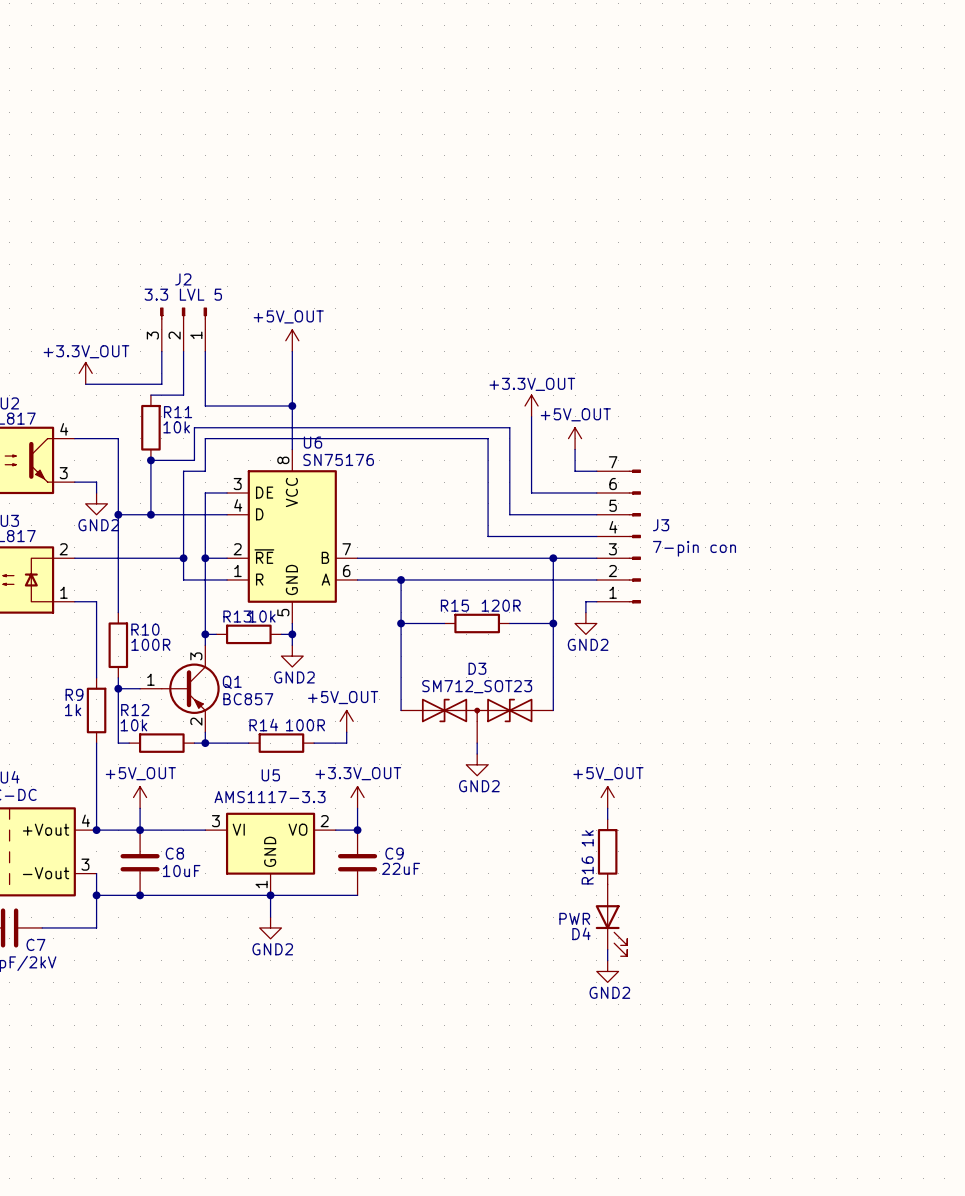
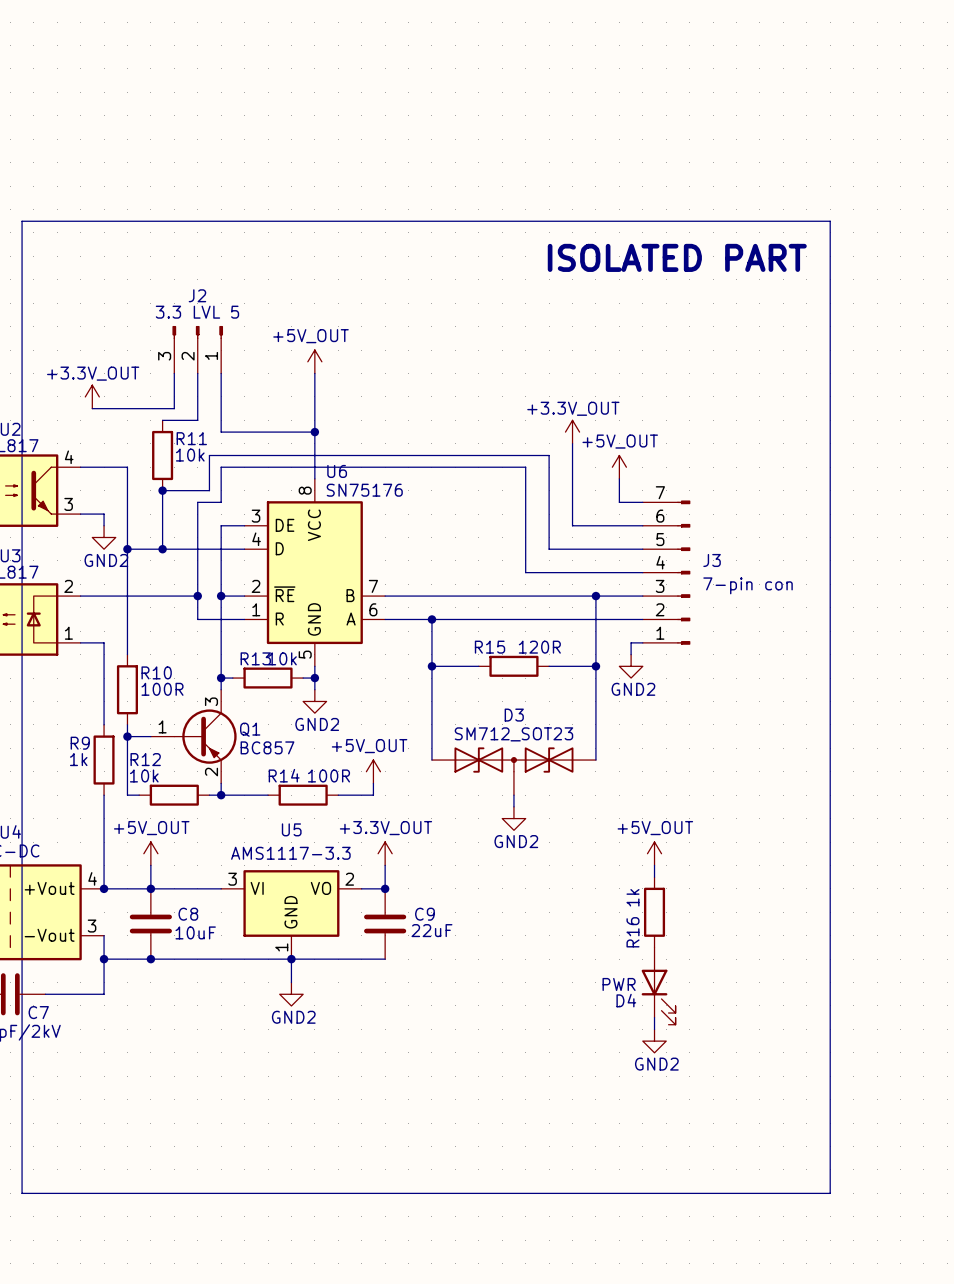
line: none -> (22, 221) (830, 221) (830, 1193) (22, 1193) (22, 221)
text: none -> ISOLATED PART (677, 257)

